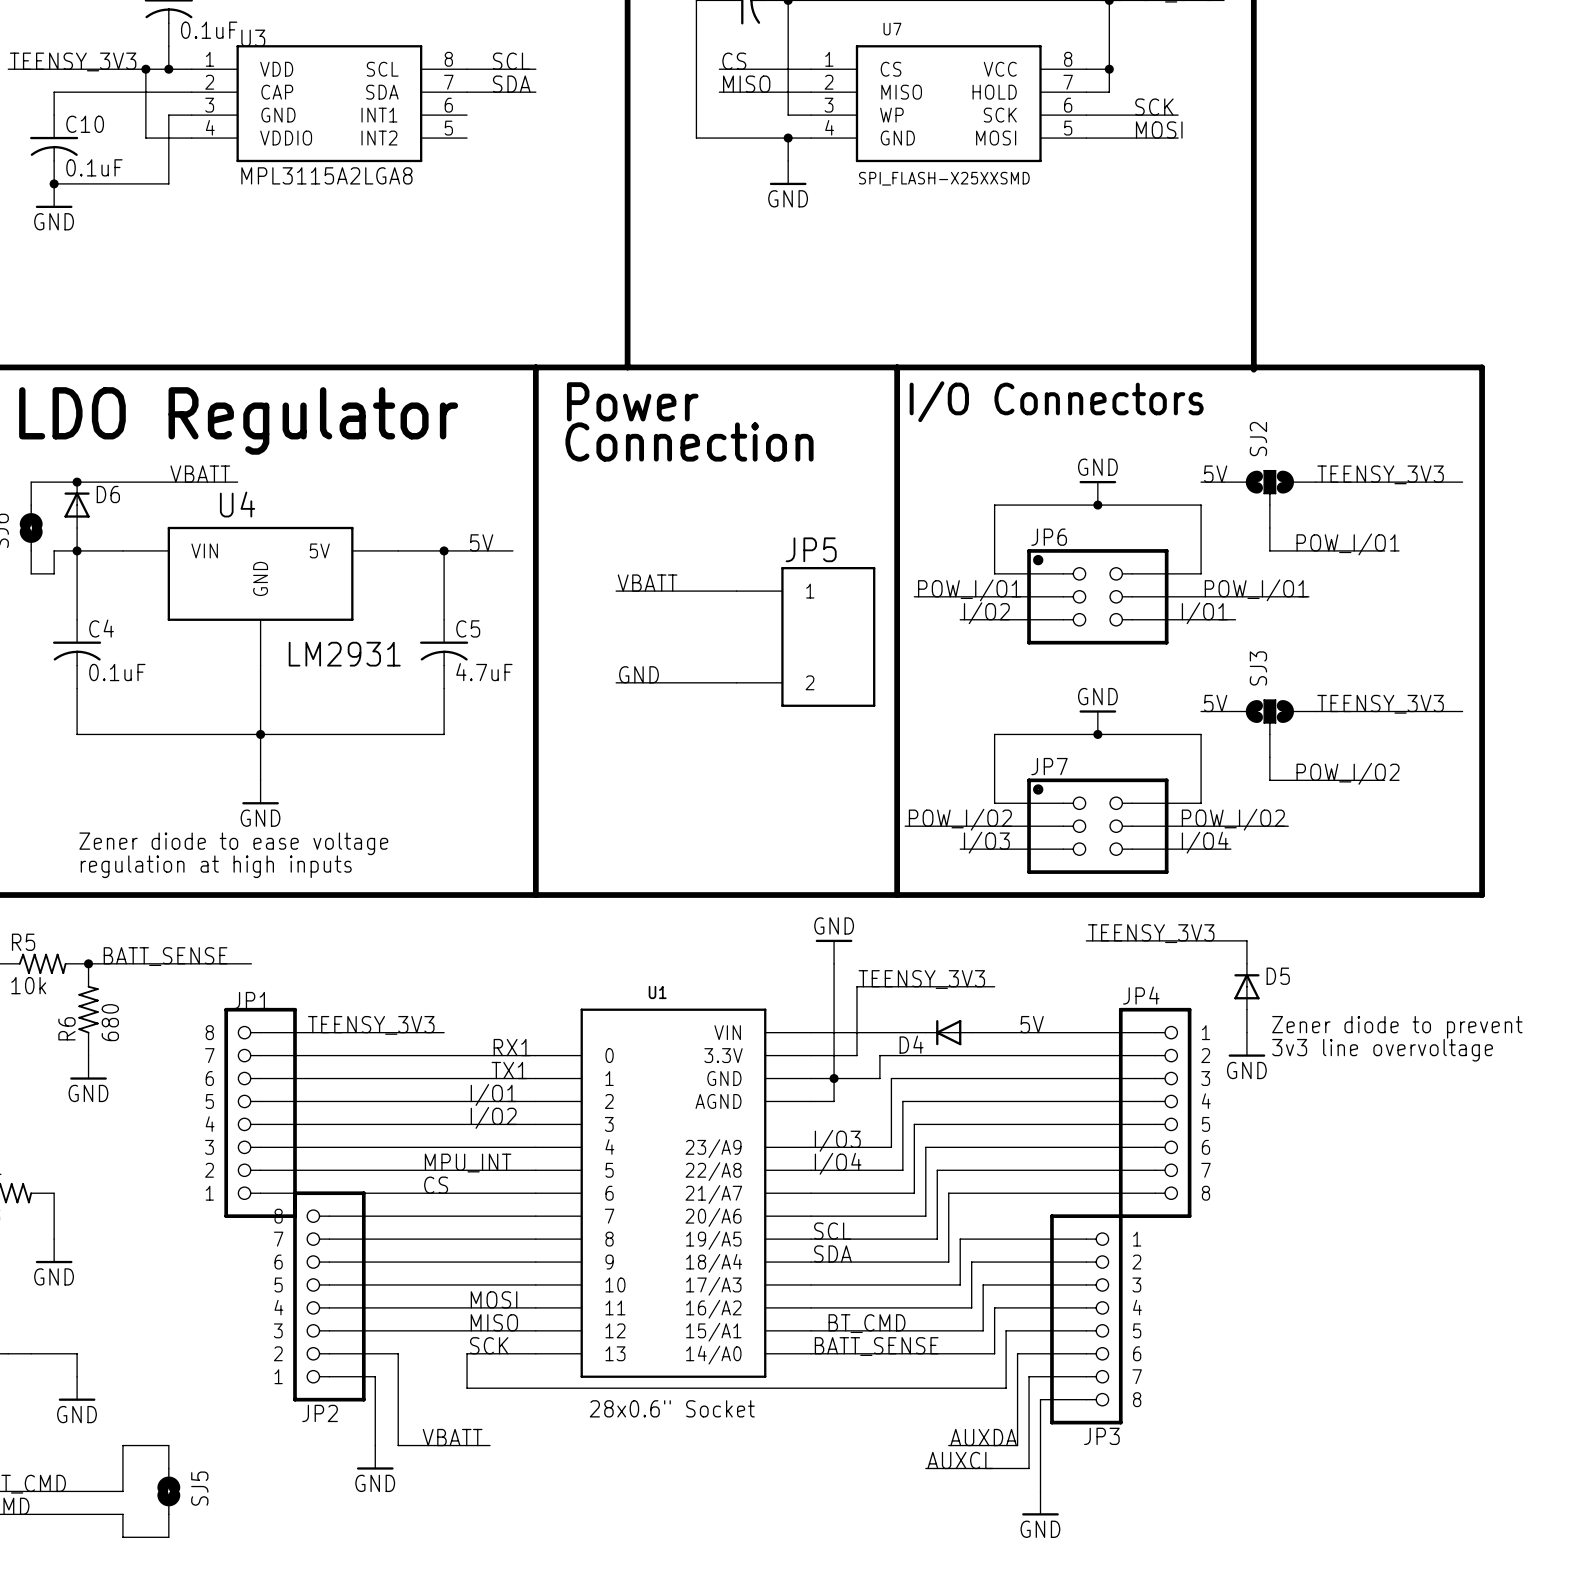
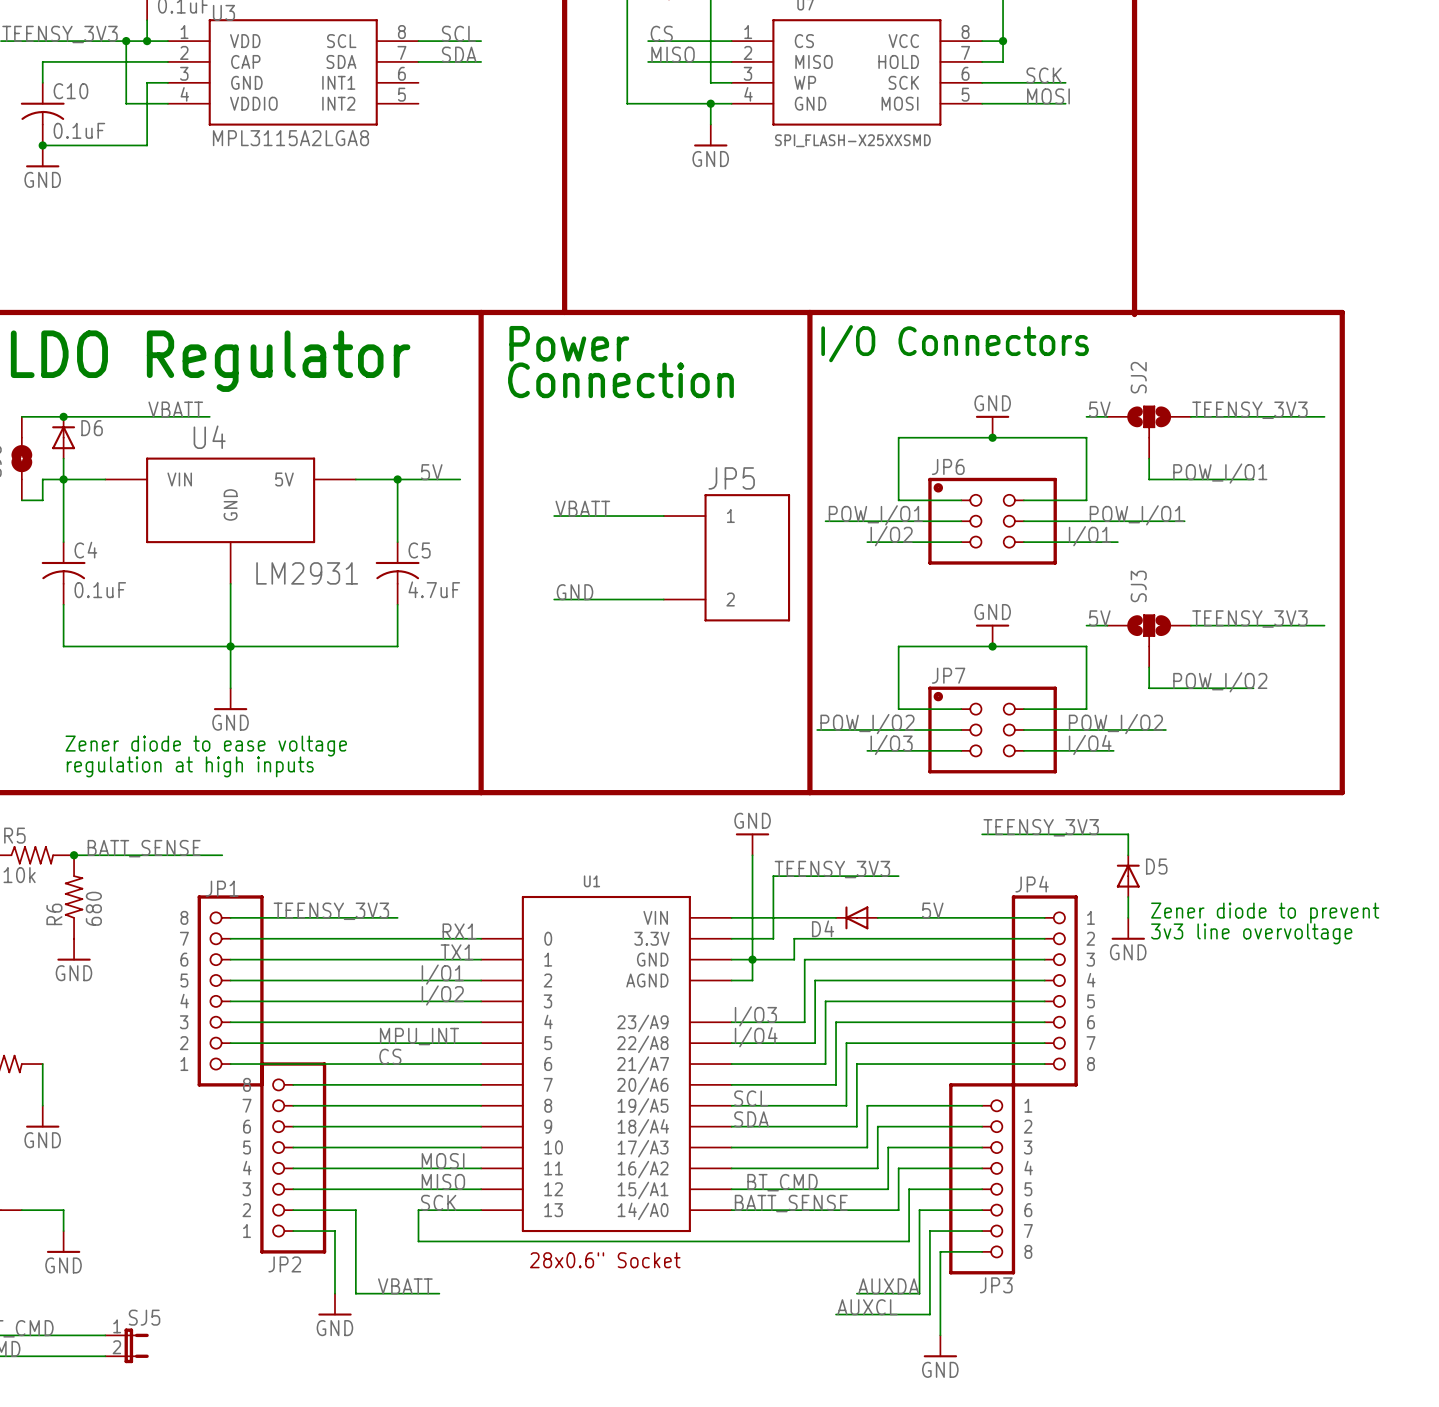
SJ5 symbol: [157, 1445, 181, 1538] -> [105, 1328, 149, 1364]
wire: (168, 1445) (122, 1445) (122, 1491) -> none
SJ5 name position: SJ5 (199, 1488) -> SJ5 (144, 1317)
wire: (122, 1514) (122, 1537) (168, 1537) -> none

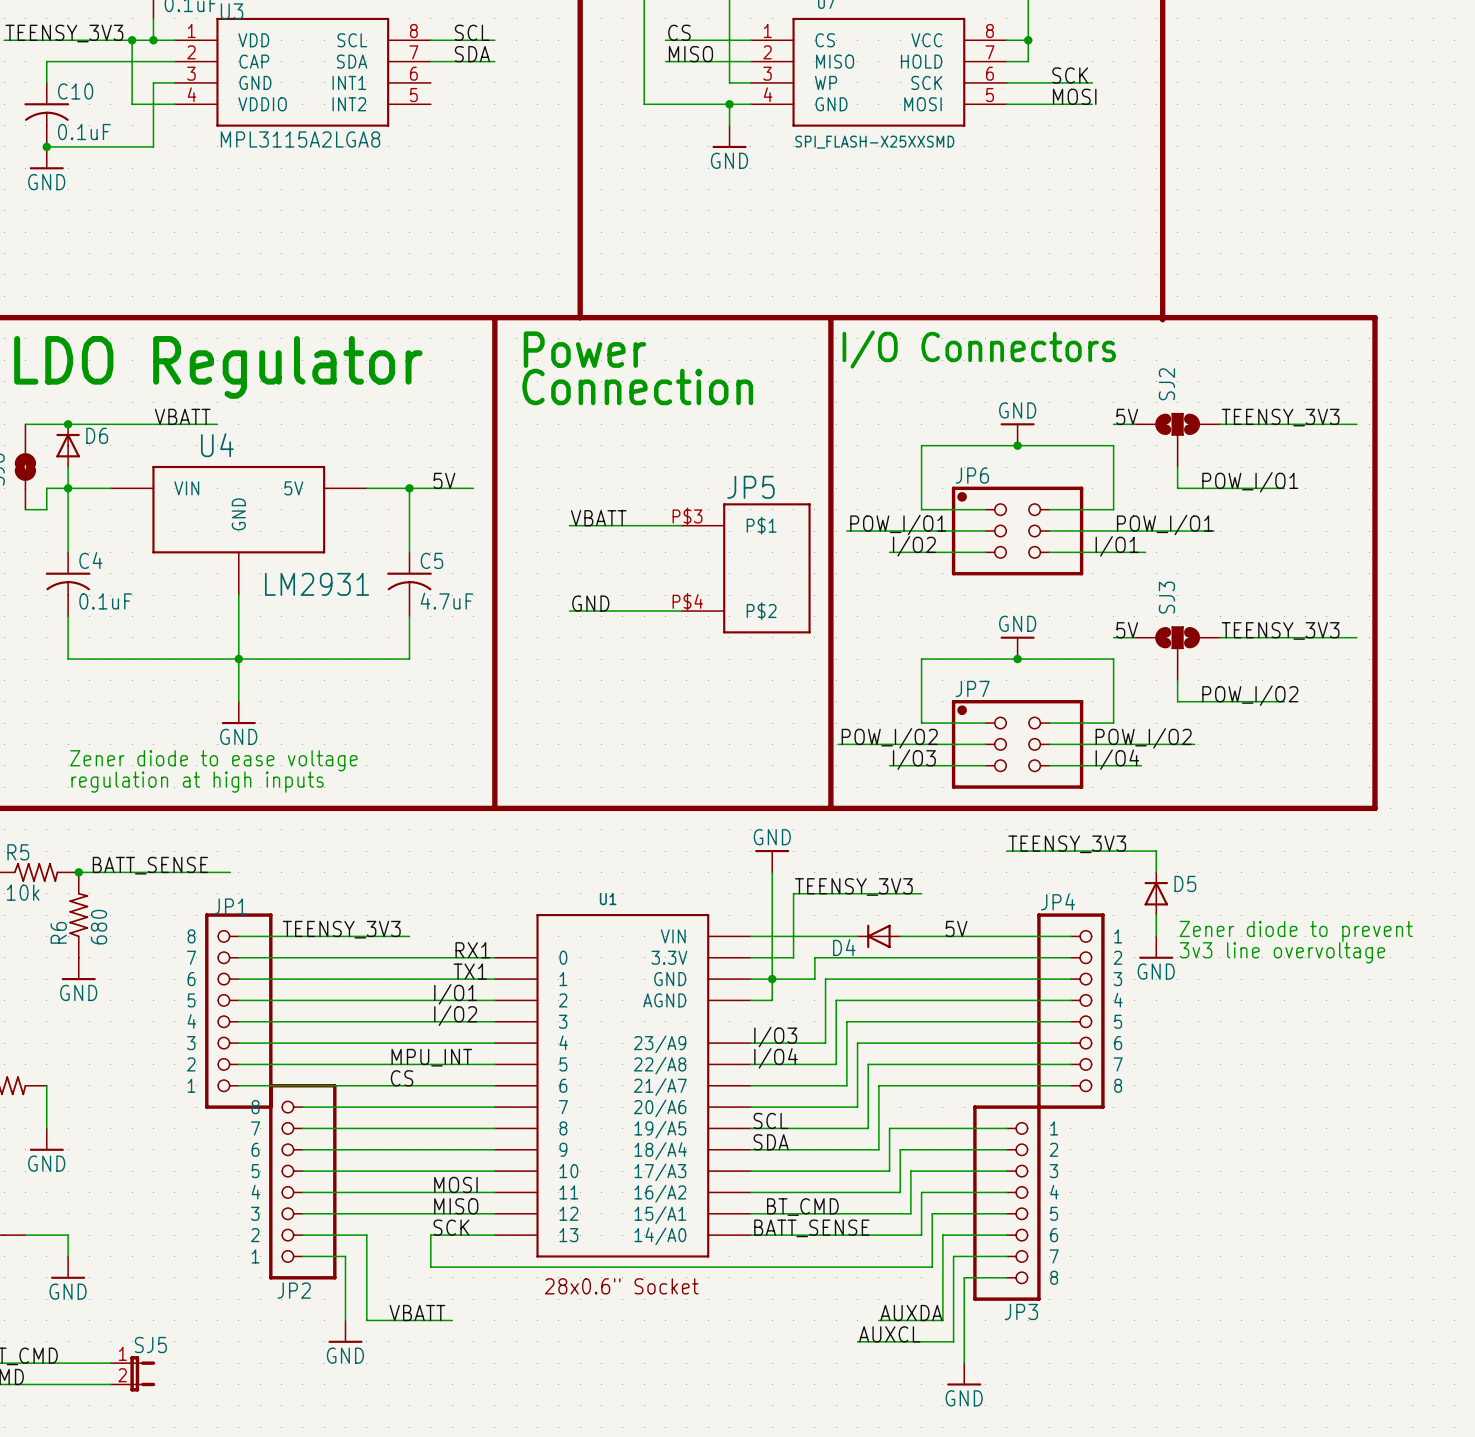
JP5 pin number: none -> P$3 (687, 516)
JP5 pin name: 1 (730, 516) -> P$1 (761, 525)
JP5 pin number: none -> P$4 (687, 601)
JP5 pin name: 2 (730, 599) -> P$2 (761, 611)

